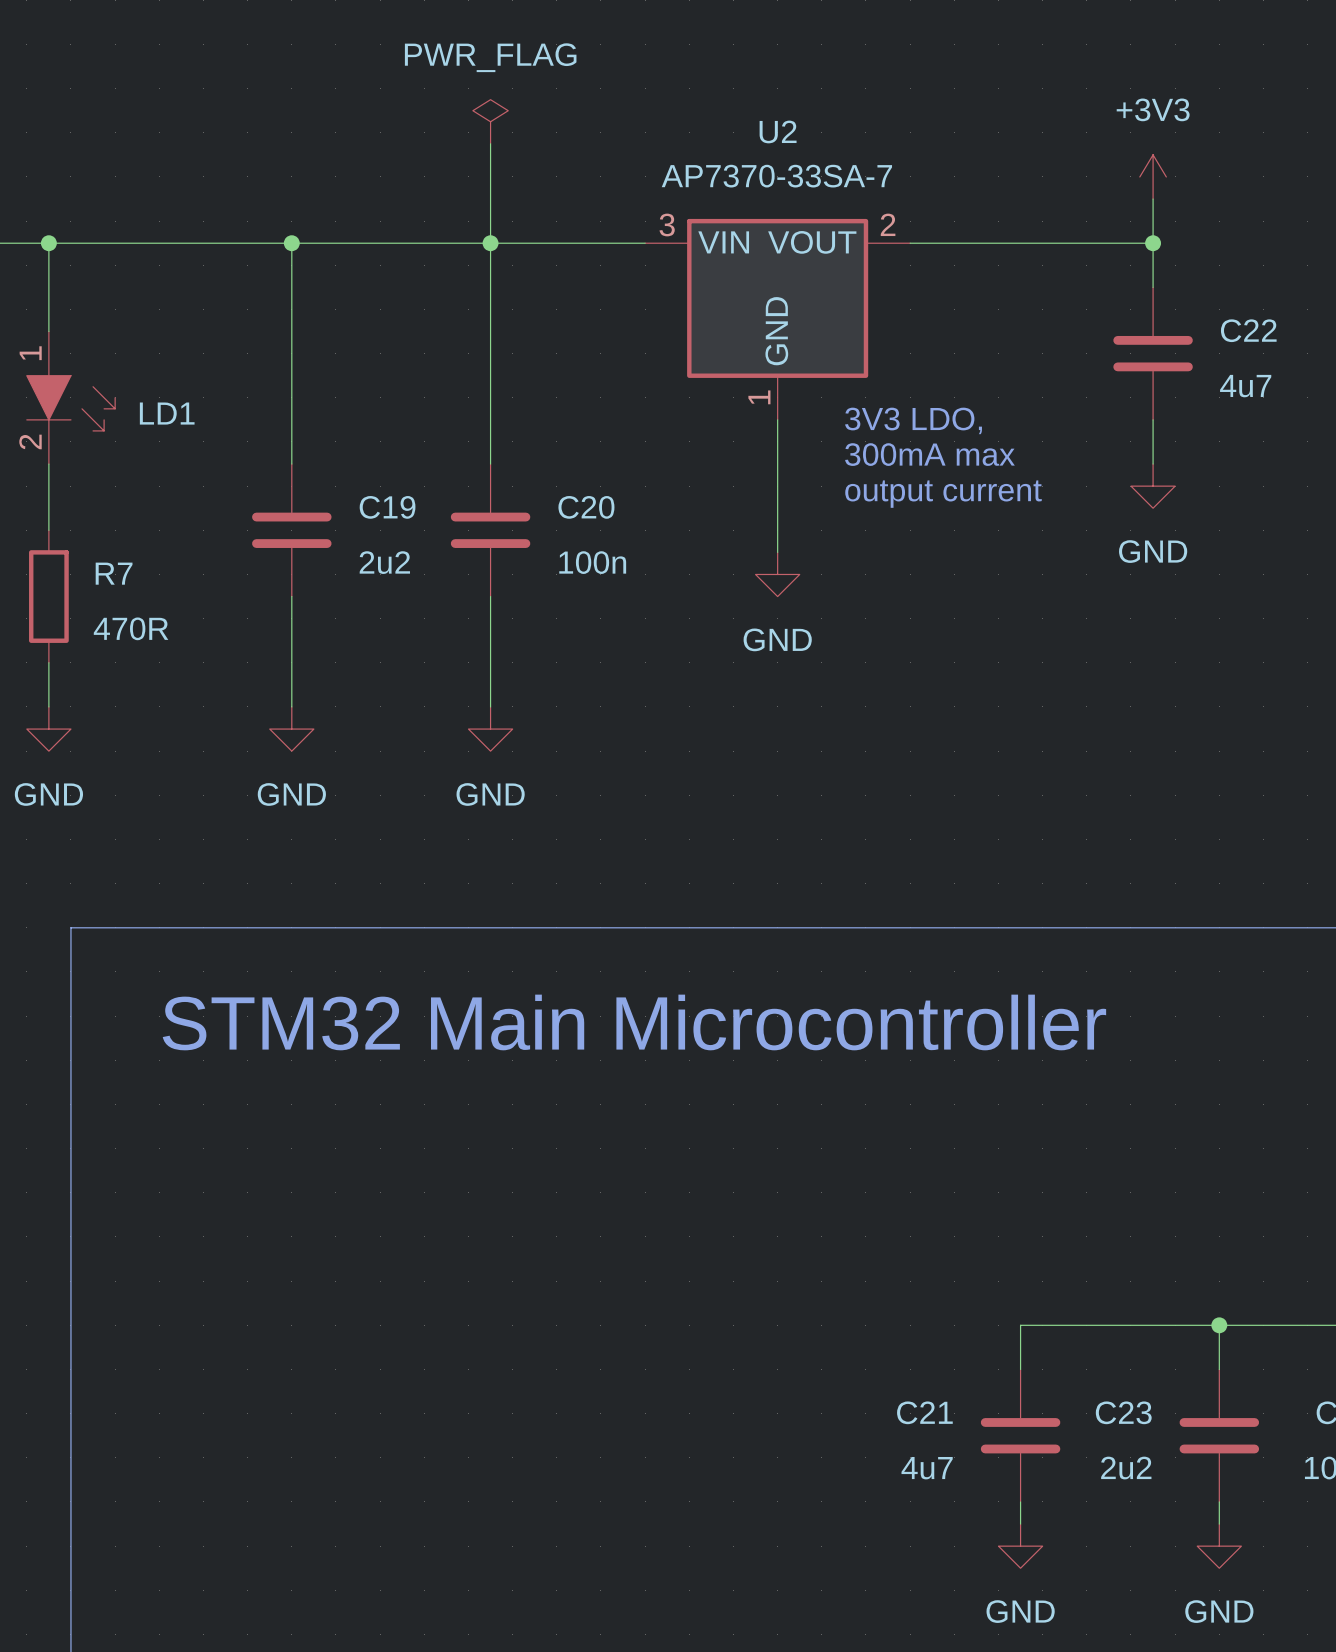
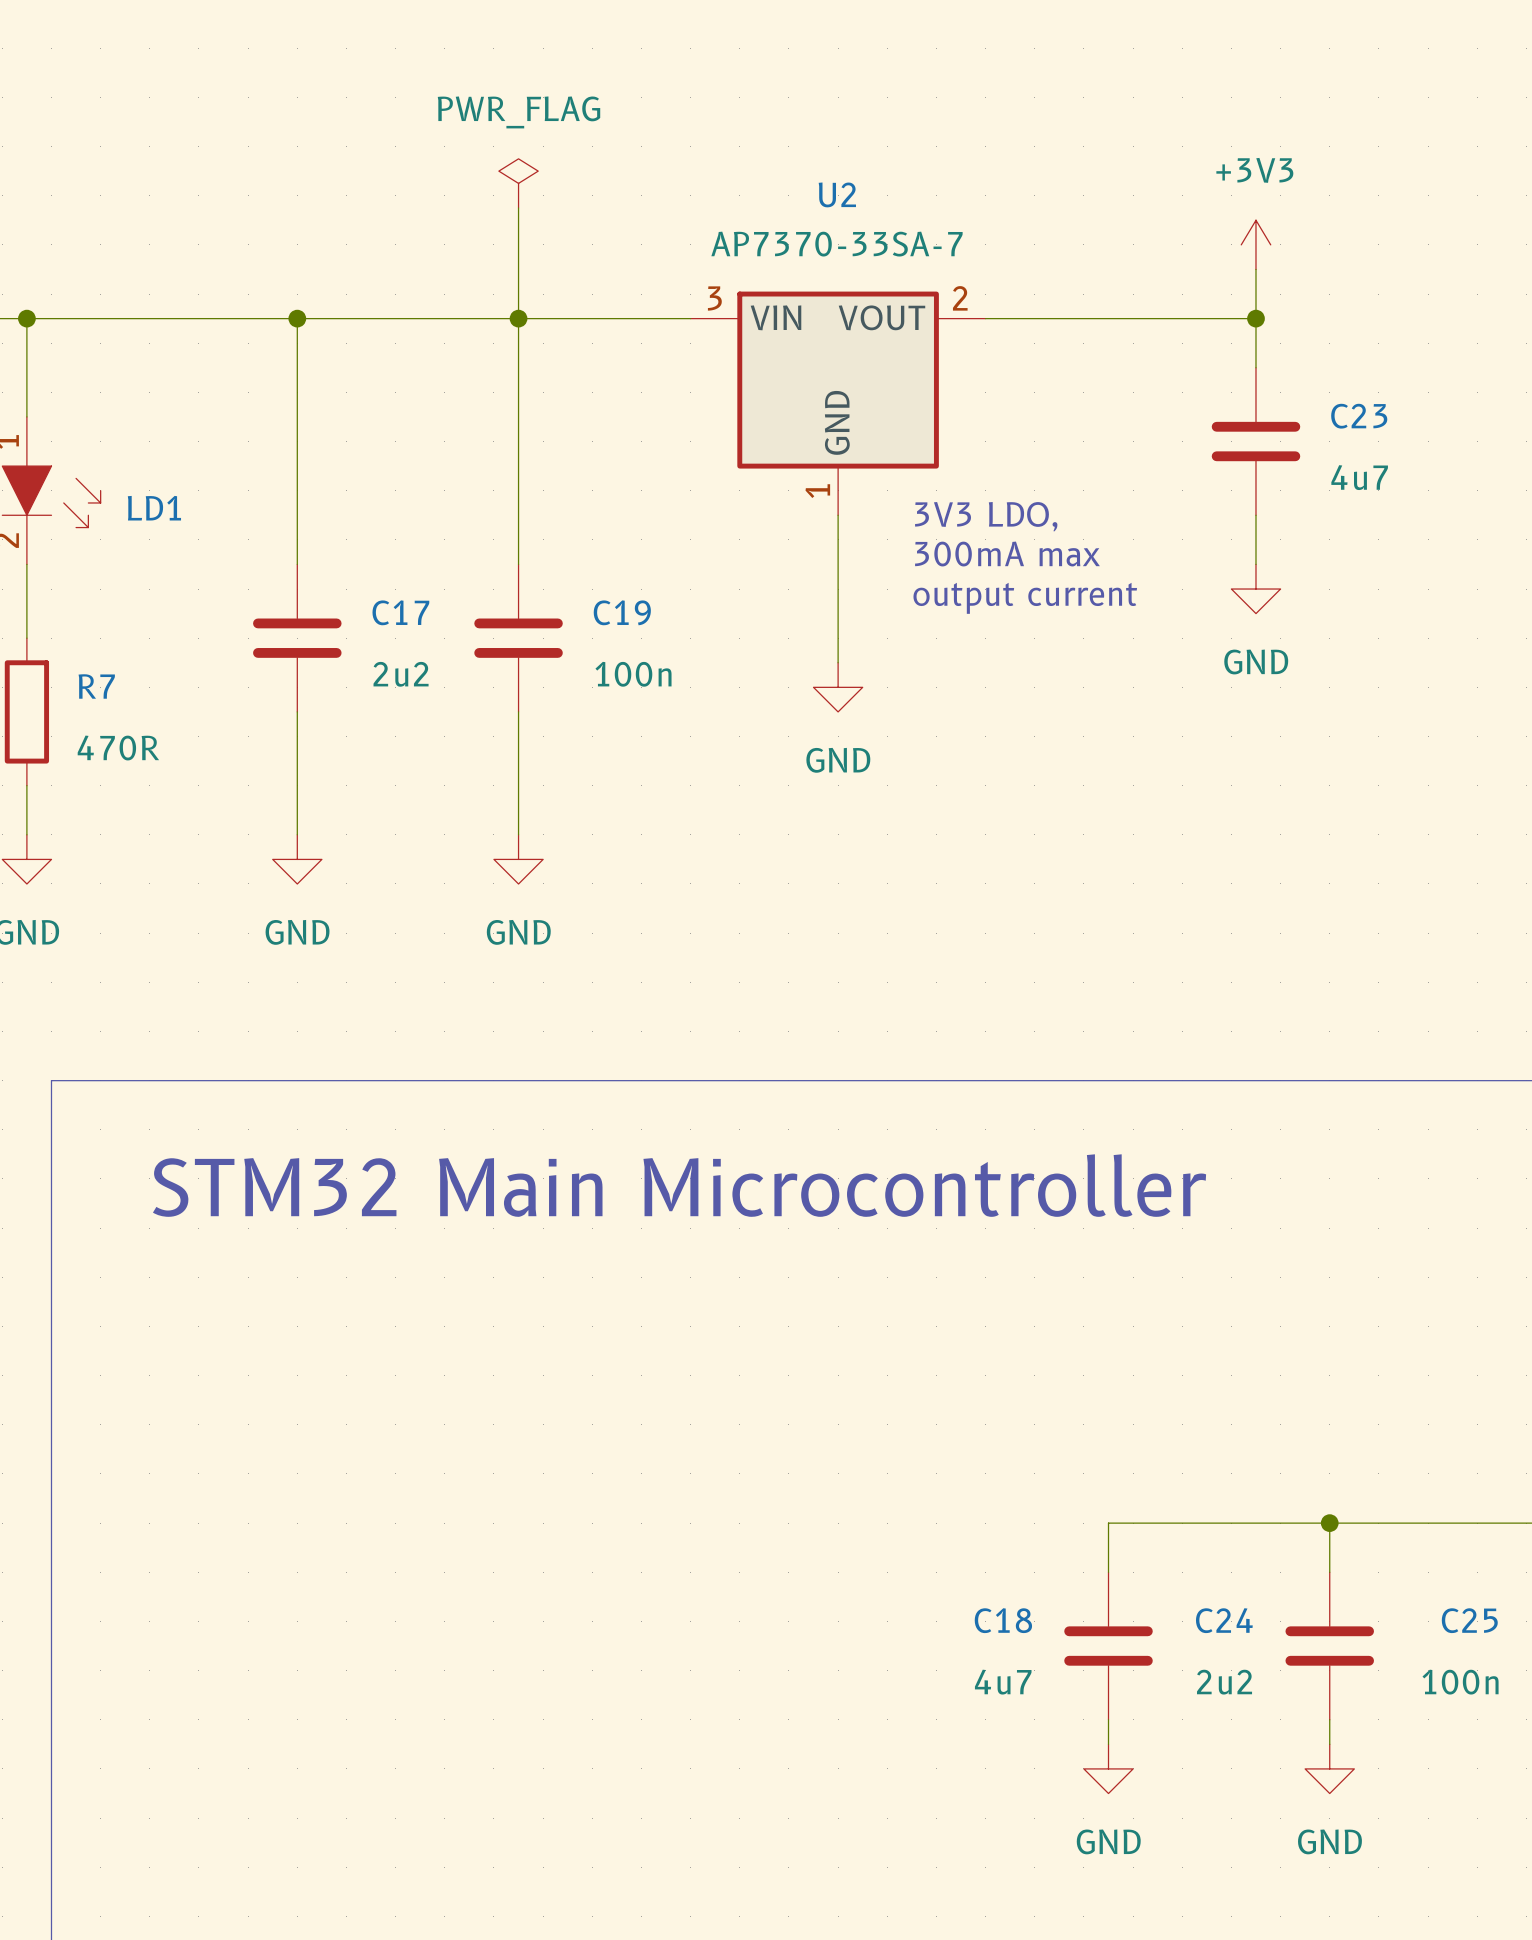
C22 name: C22 (1248, 330) -> C23 (1359, 416)
C19 name: C19 (387, 507) -> C17 (400, 612)
C20 name: C20 (586, 507) -> C19 (622, 612)
C21 name: C21 (924, 1412) -> C18 (1003, 1620)
C23 name: C23 (1123, 1412) -> C24 (1224, 1620)

